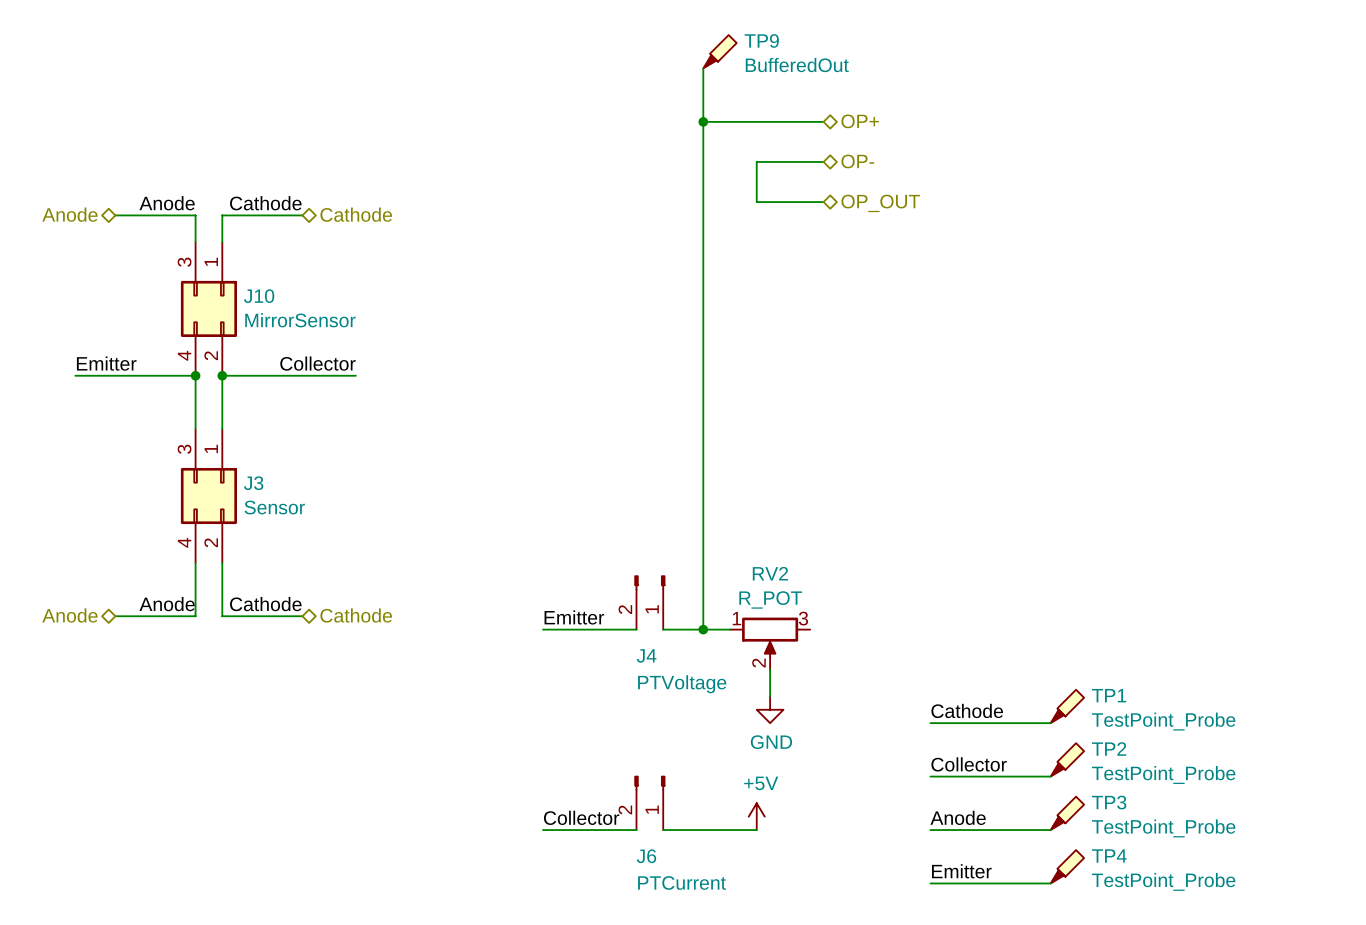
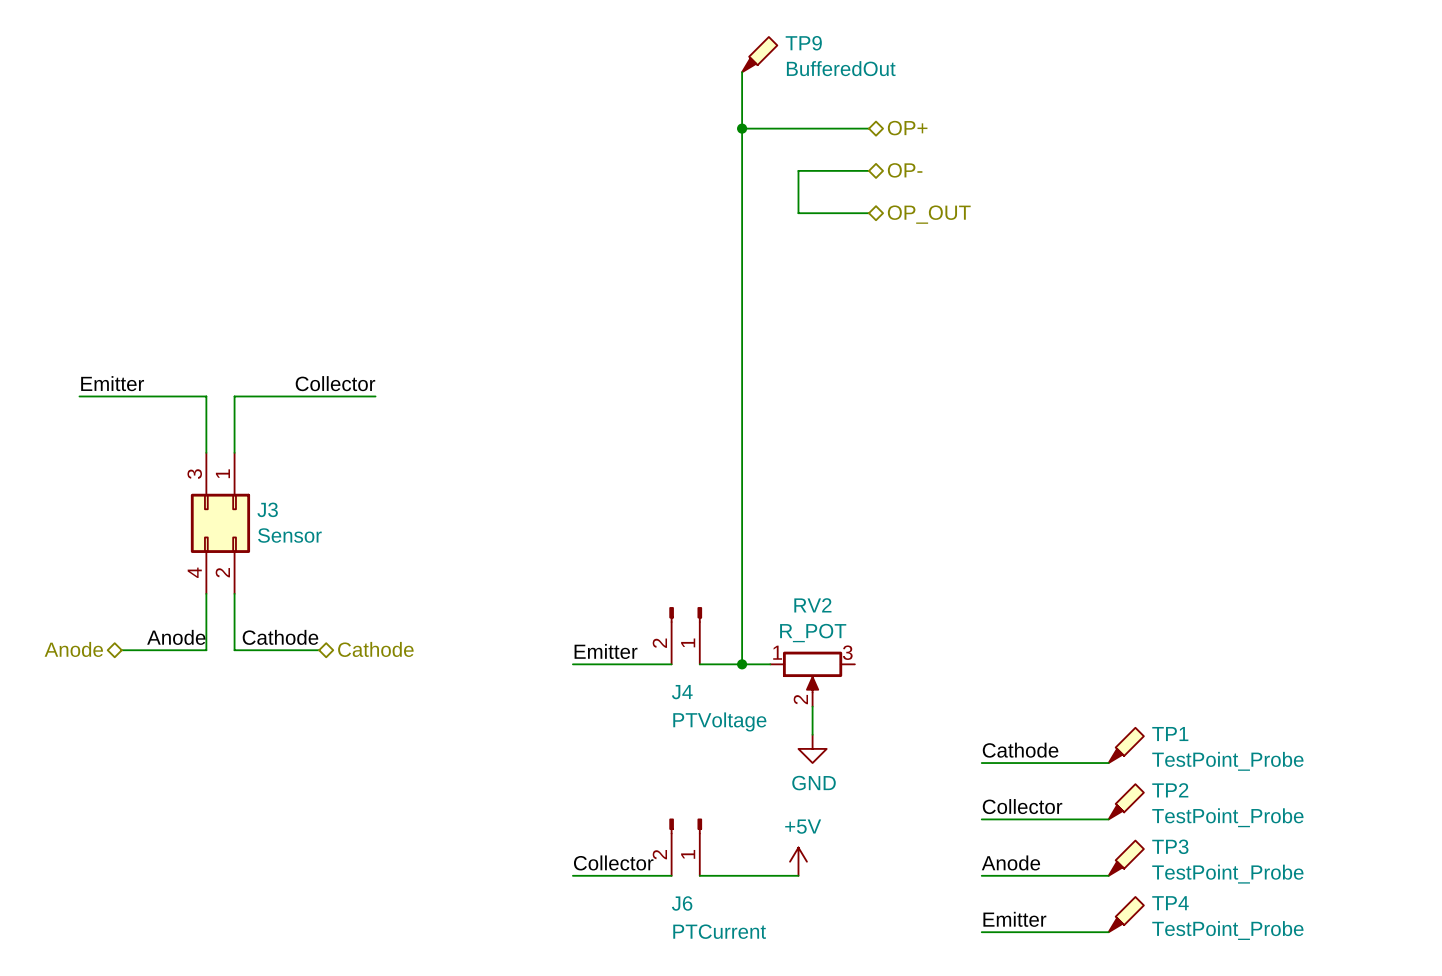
label: Anode (167, 203) -> none
label: Cathode (265, 203) -> none
hierarchical label: Anode (69, 214) -> none
hierarchical label: Cathode (356, 214) -> none
wire: (115, 215) (195, 215) (195, 242) -> none
wire: (302, 215) (222, 215) (222, 242) -> none
J10: MirrorSensor (208, 308) -> none
junction: (195, 375) -> none
junction: (222, 375) -> none

